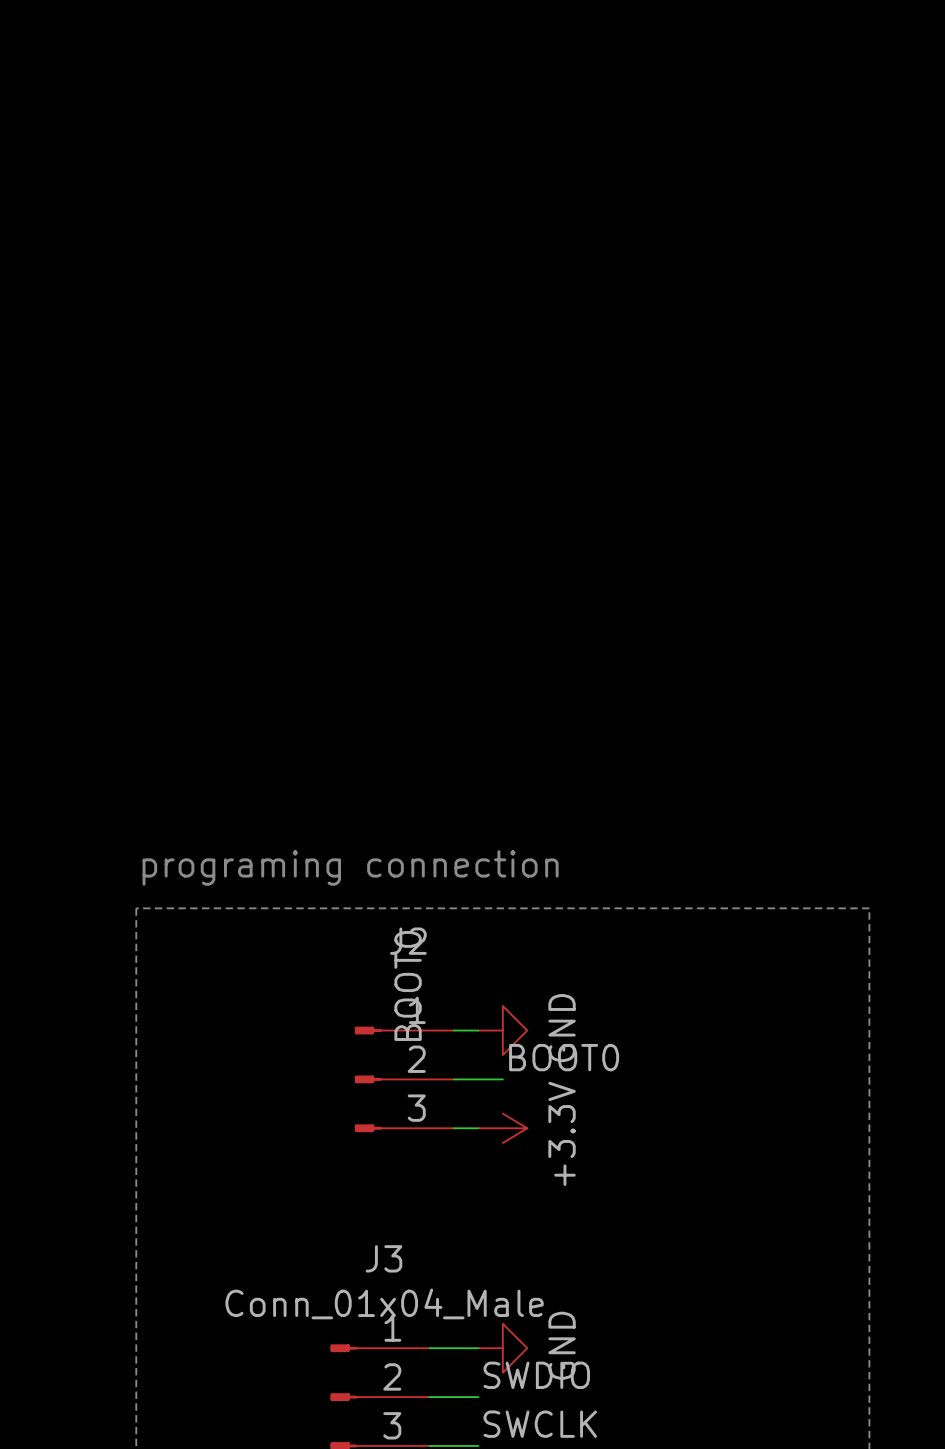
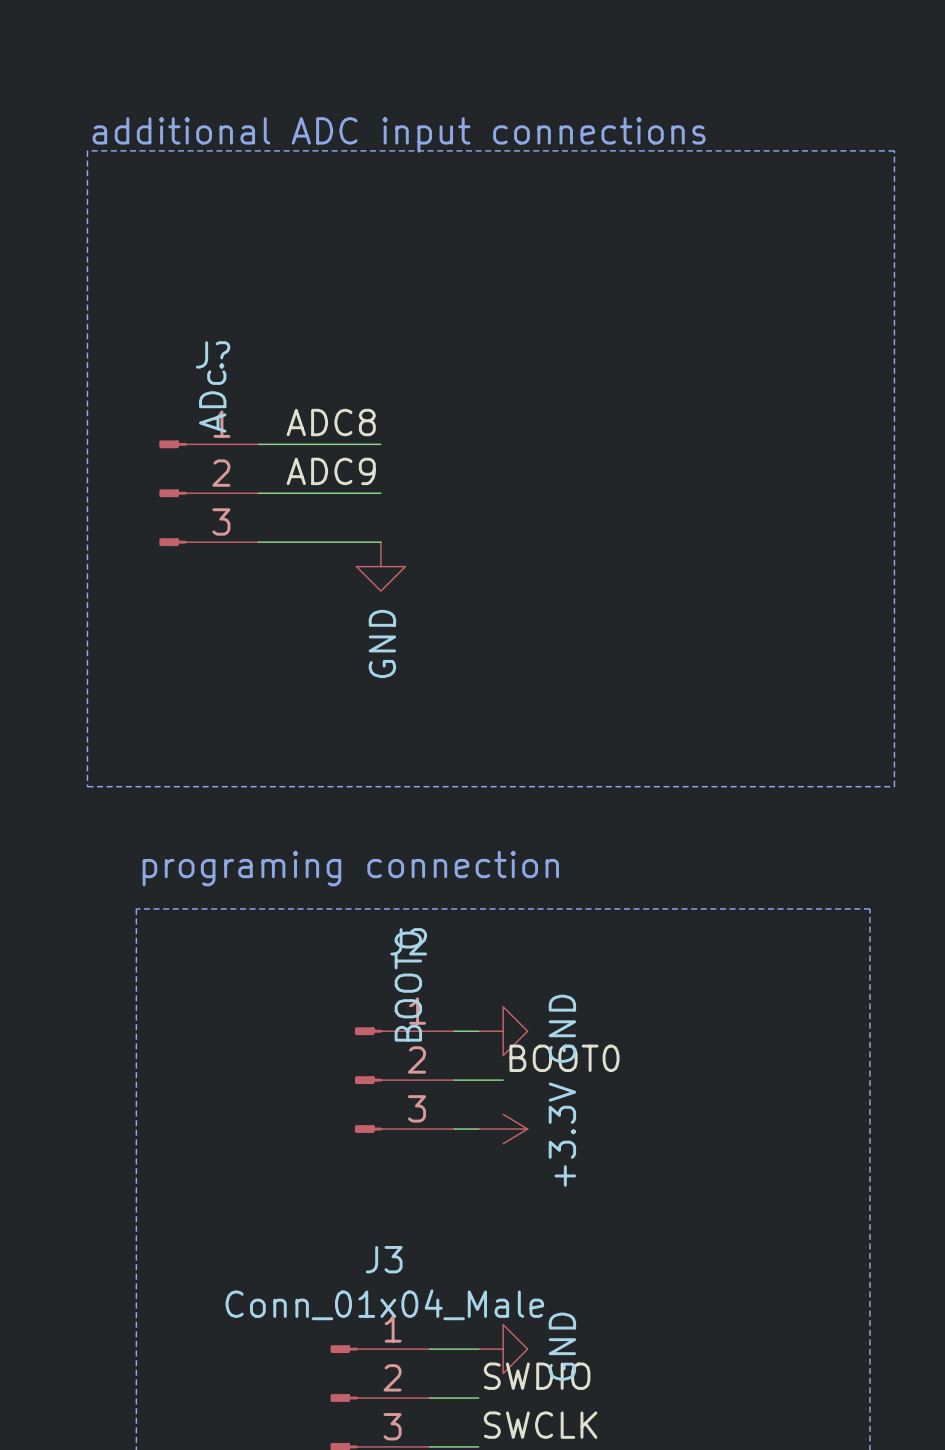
text: none -> additional ADC input connections (399, 134)
line: none -> (87, 150) (894, 150) (894, 786) (87, 786) (87, 150)
label: none -> ADC8 (331, 422)
wire: none -> (258, 444) (380, 444)
label: none -> ADC9 (331, 471)
J?: none -> ADc (208, 493)
wire: none -> (258, 493) (380, 493)
wire: none -> (258, 542) (380, 542)
power symbol: none -> GND (380, 566)

